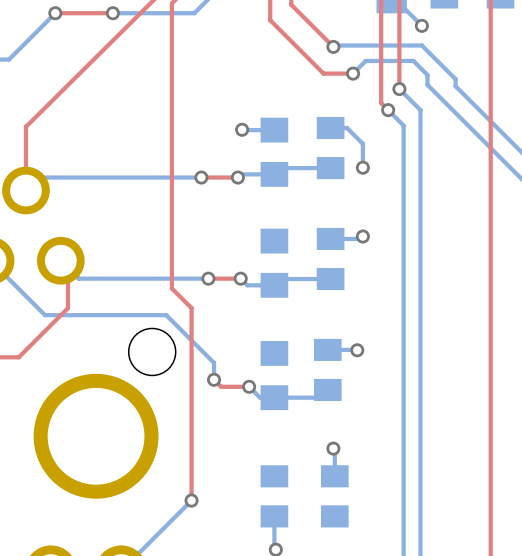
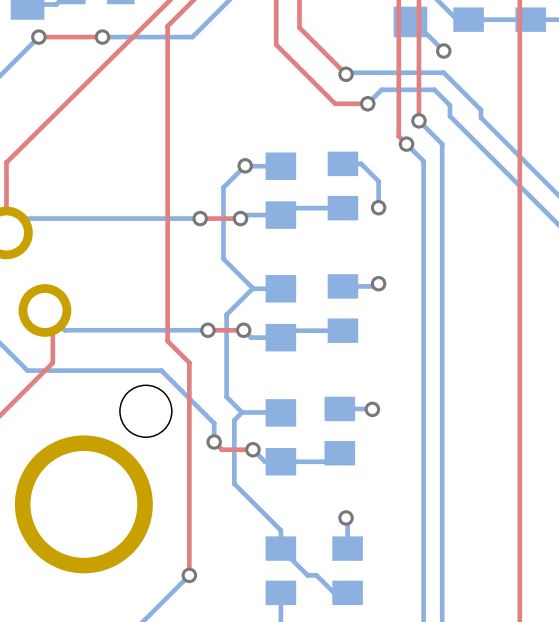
bottom track: none -> (245, 165) (223, 187) (223, 258) (253, 288)
bottom track: none -> (280, 288) (252, 288) (226, 314) (226, 396) (242, 412)
bottom track: none -> (242, 412) (234, 420) (234, 483) (280, 530) (280, 548) (307, 575) (316, 575) (334, 592) (347, 592)
bottom track: none -> (242, 412) (280, 412)

